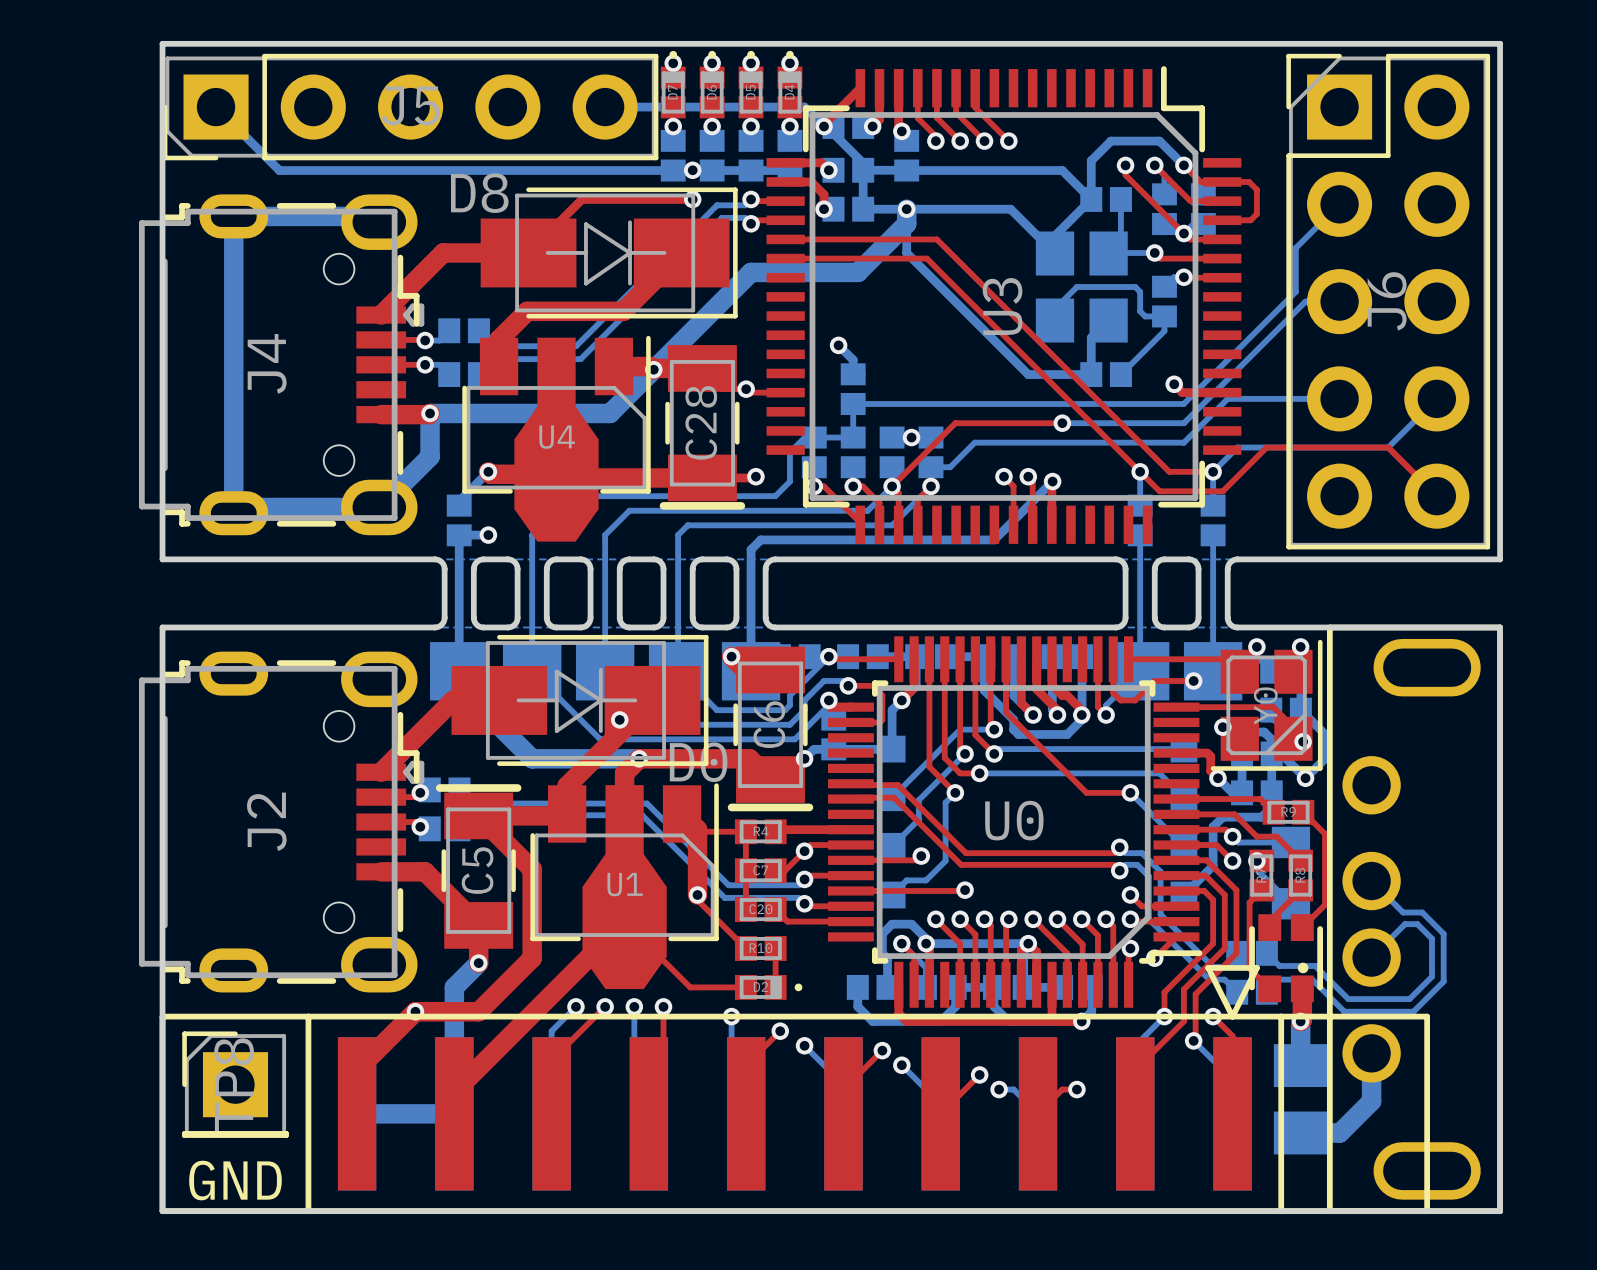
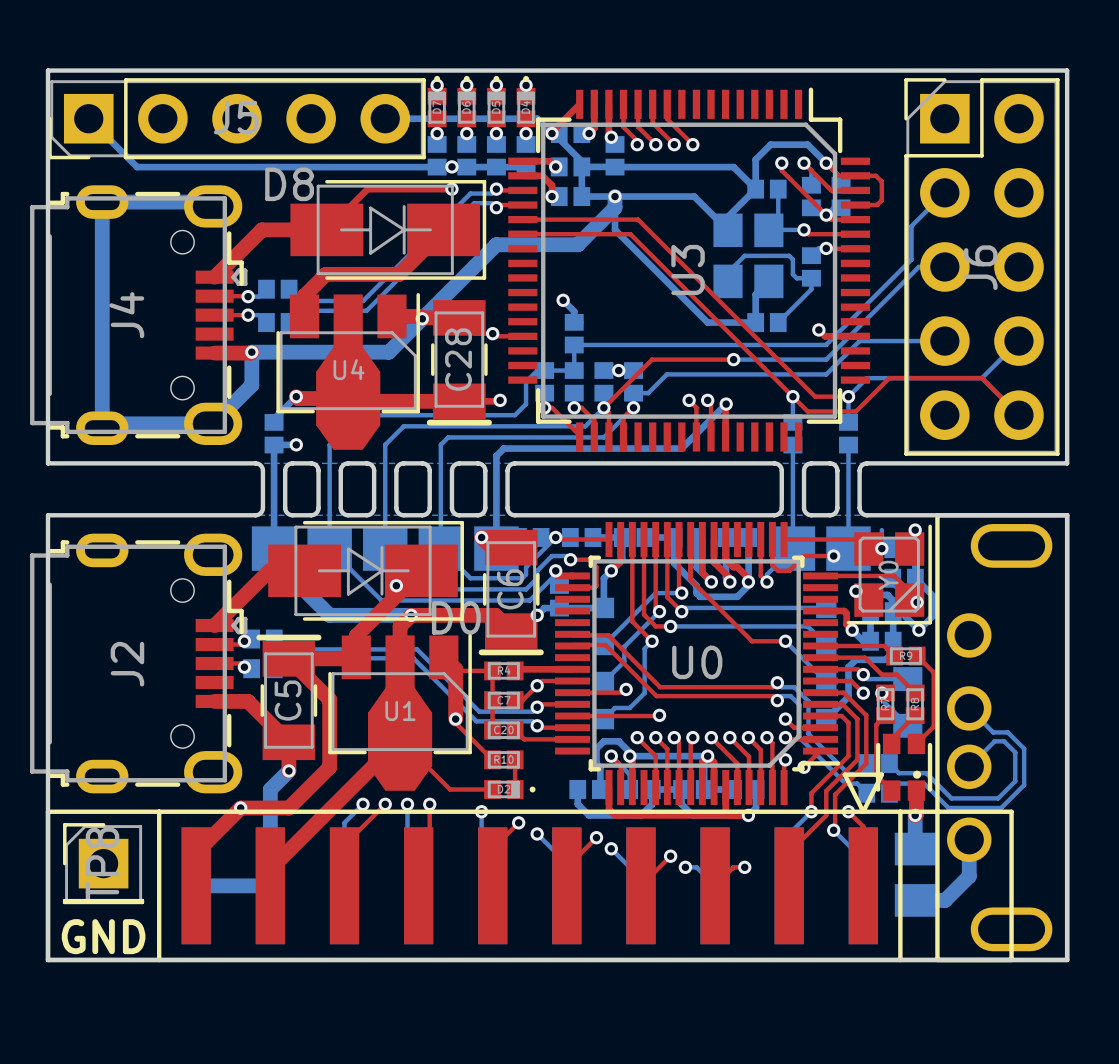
via position: (1256, 646) -> (881, 548)

